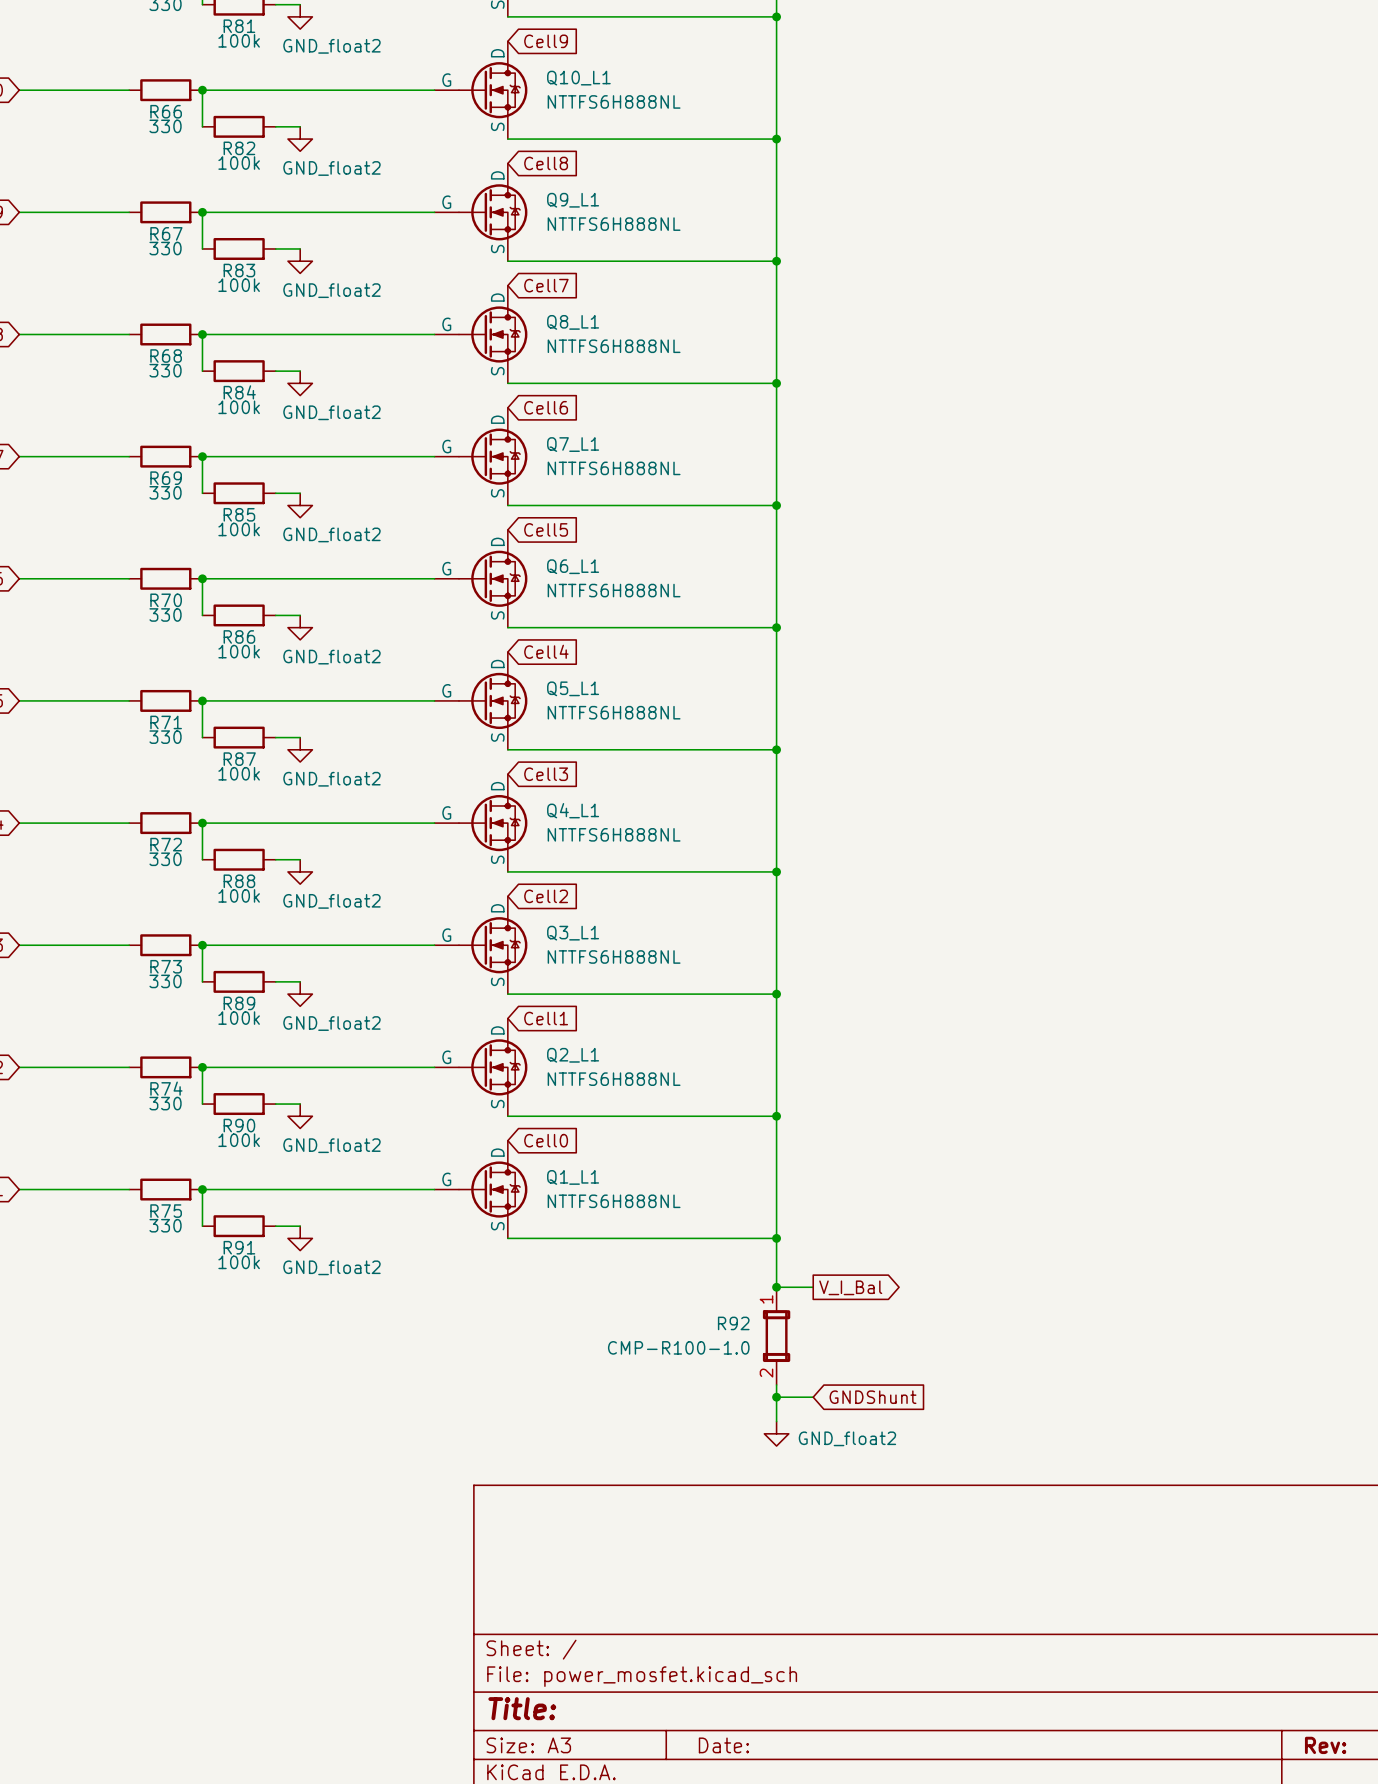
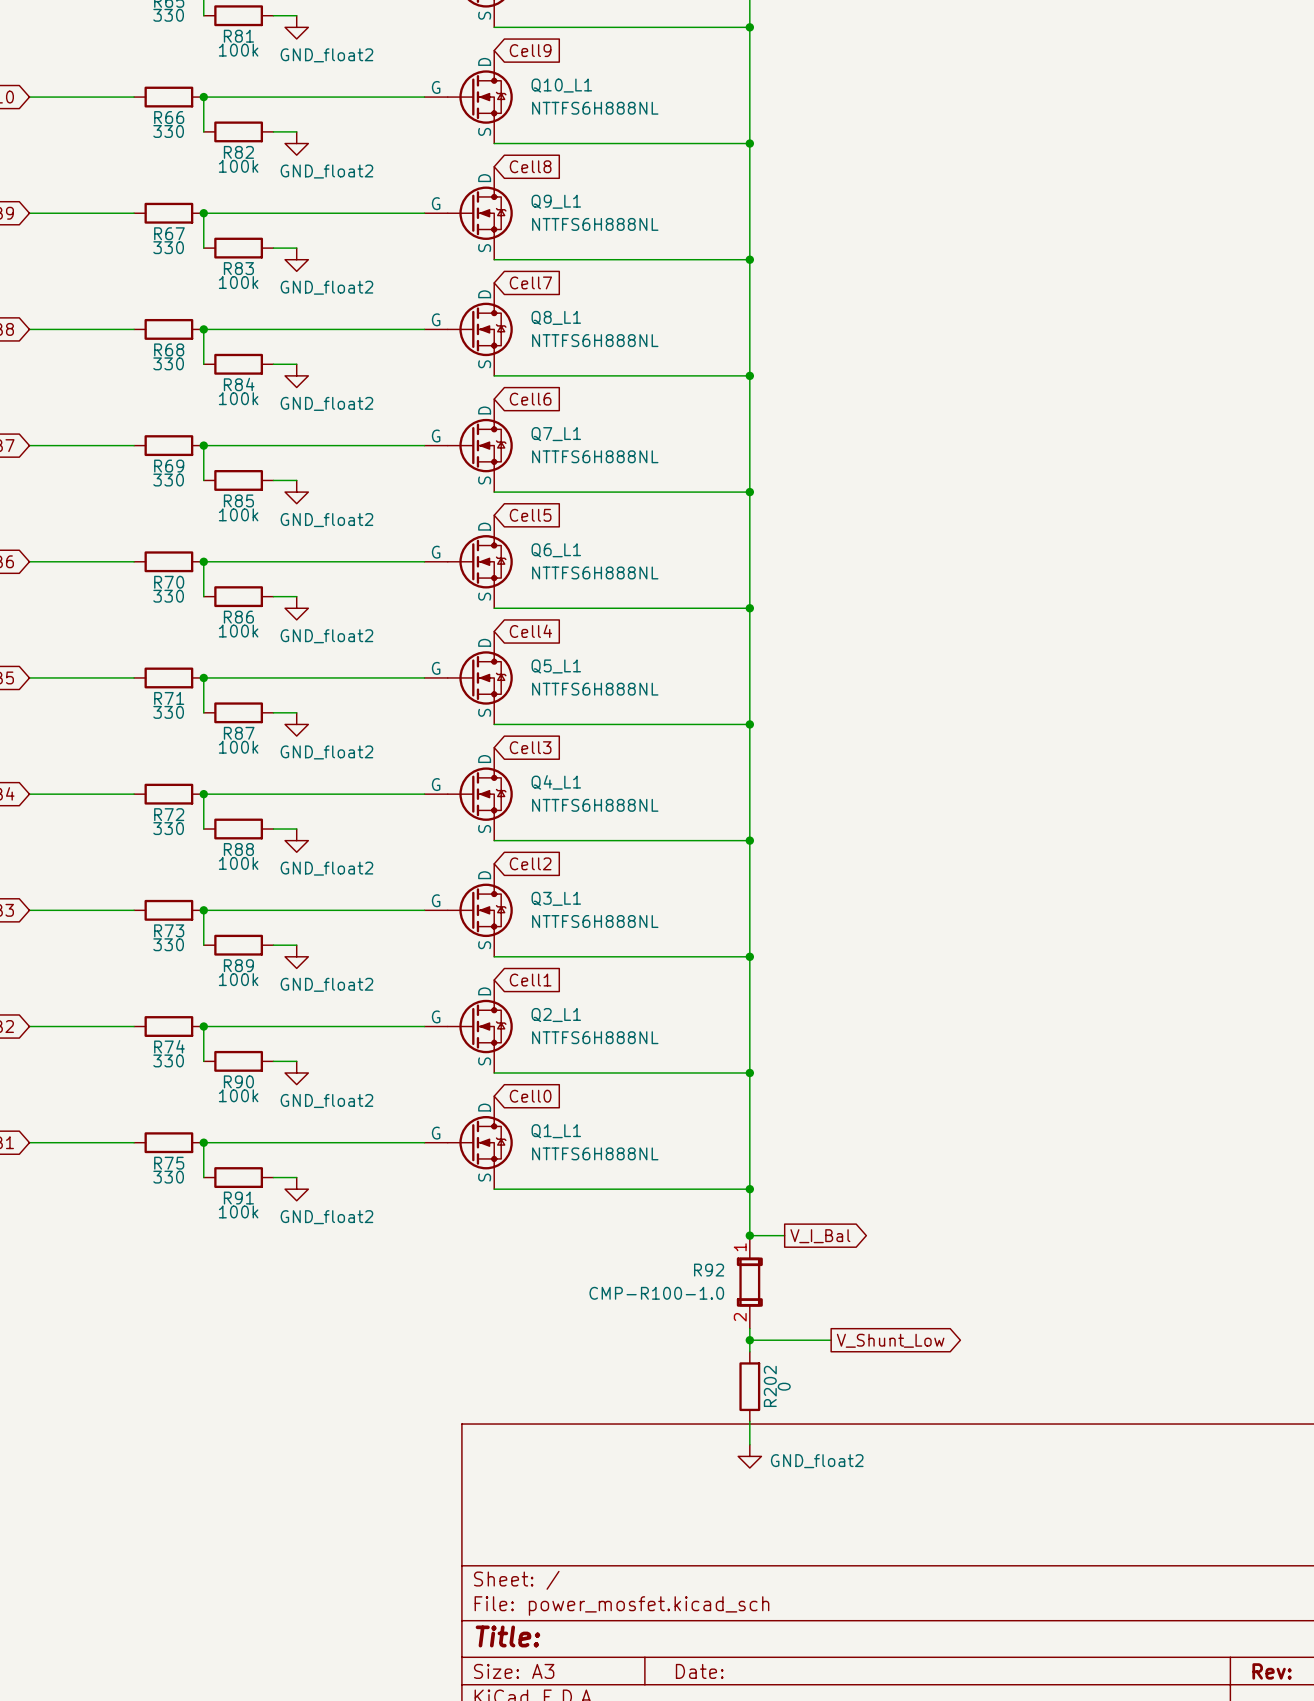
wire: none -> (784, 1340) (831, 1340)
global label: GNDShunt (873, 1397) -> none
global label: none -> V_Shunt_Low (890, 1340)
power symbol position: GND_float2 (776, 1433) -> GND_float2 (749, 1456)
R202: none -> 0 (749, 1386)
wire: none -> (749, 1421) (749, 1444)

